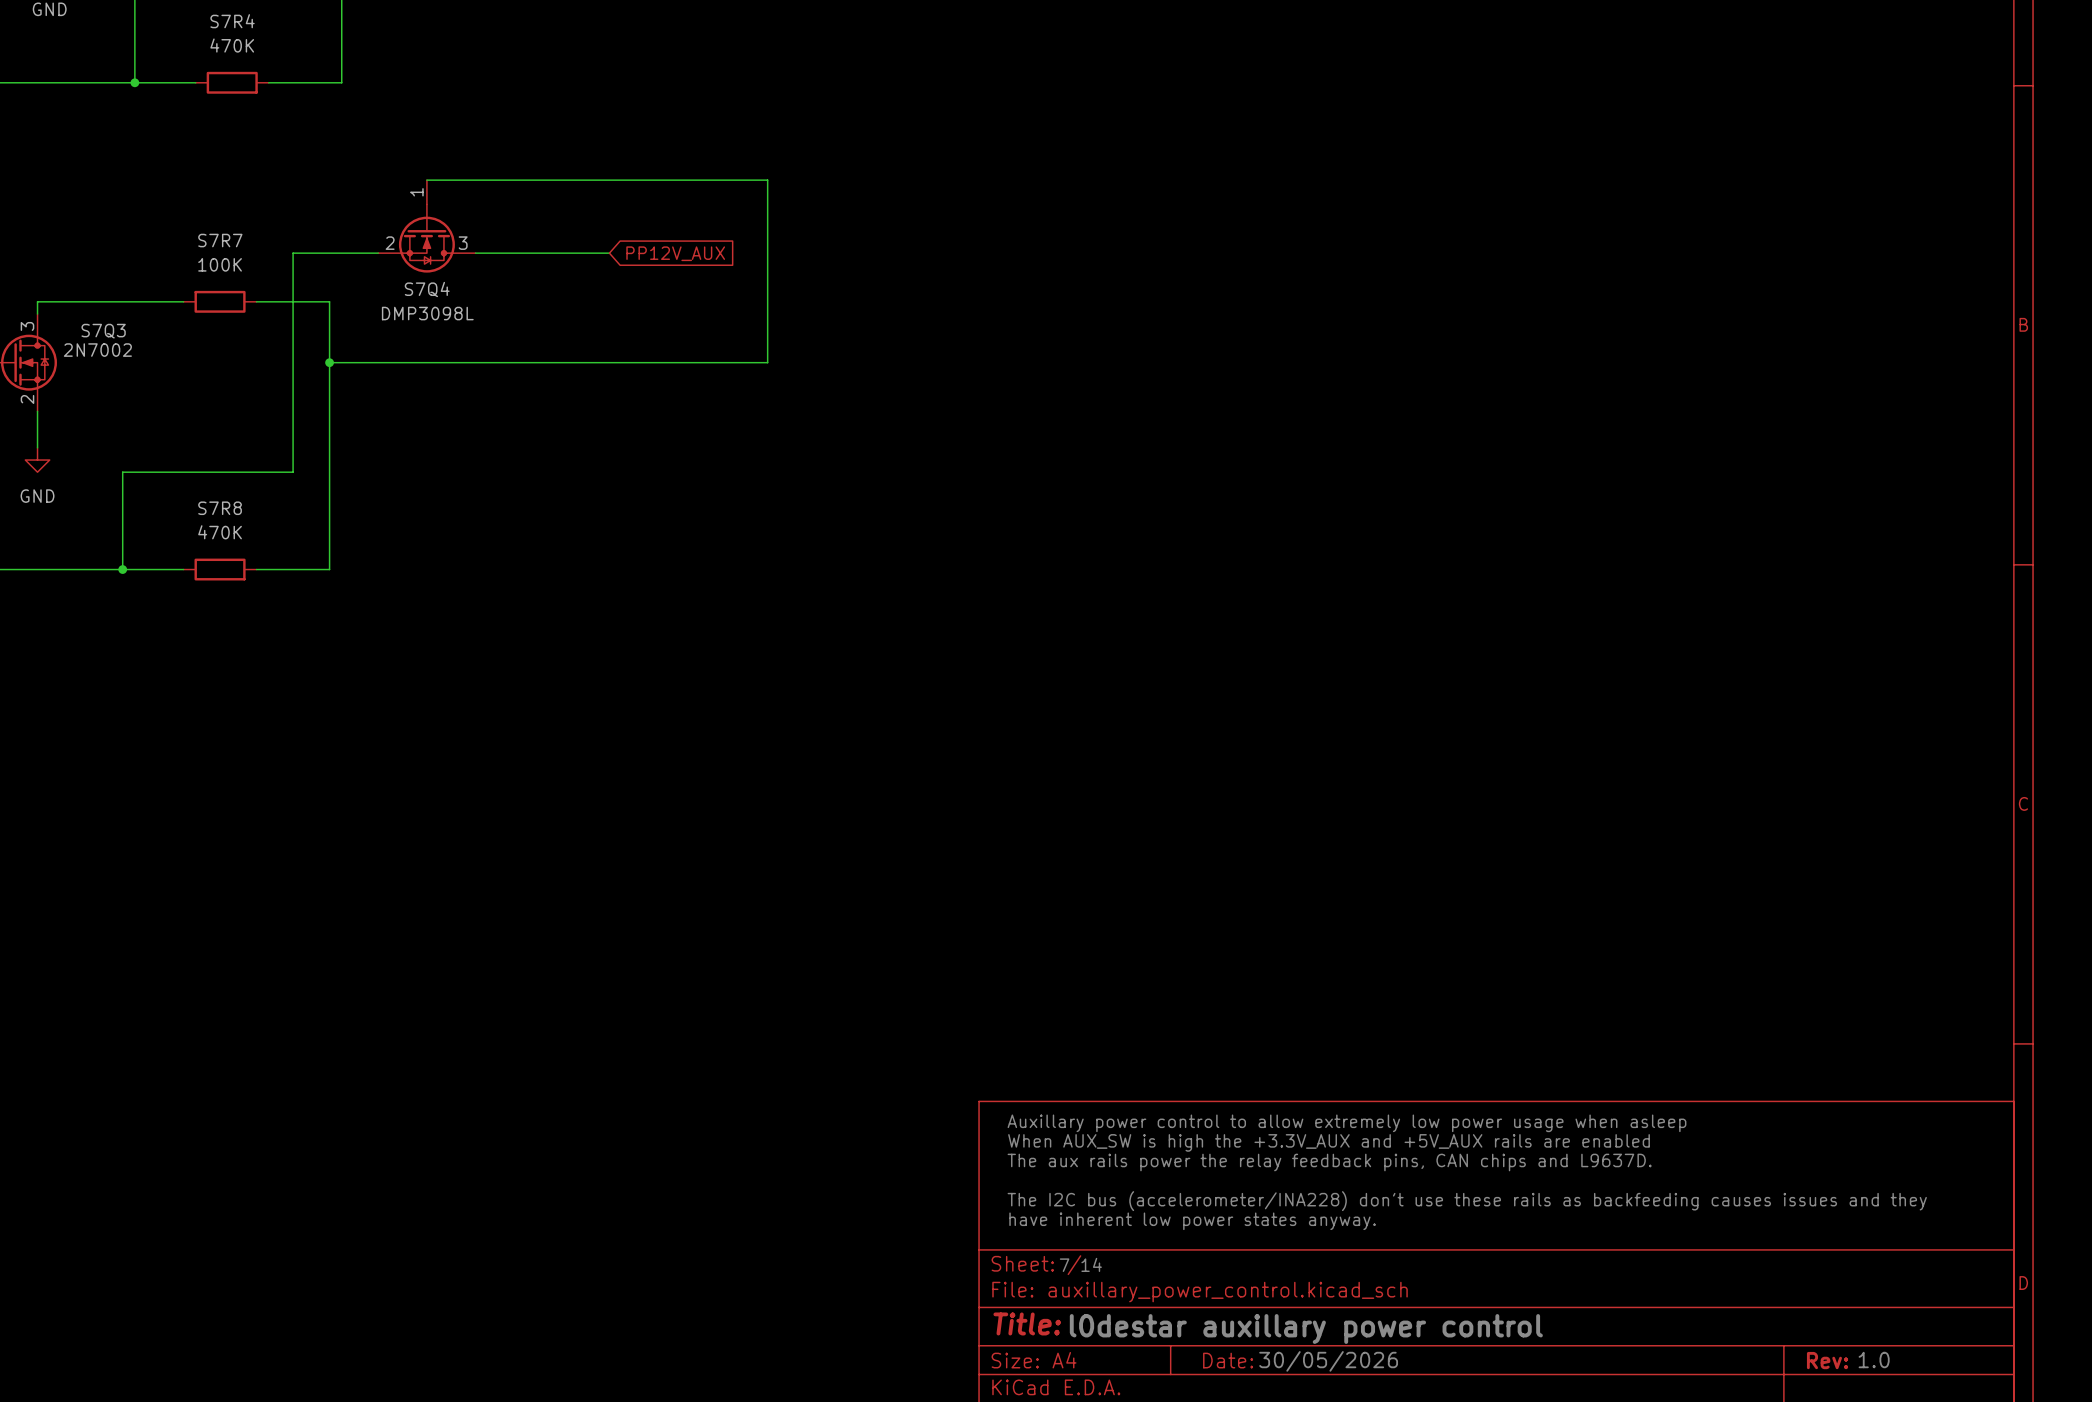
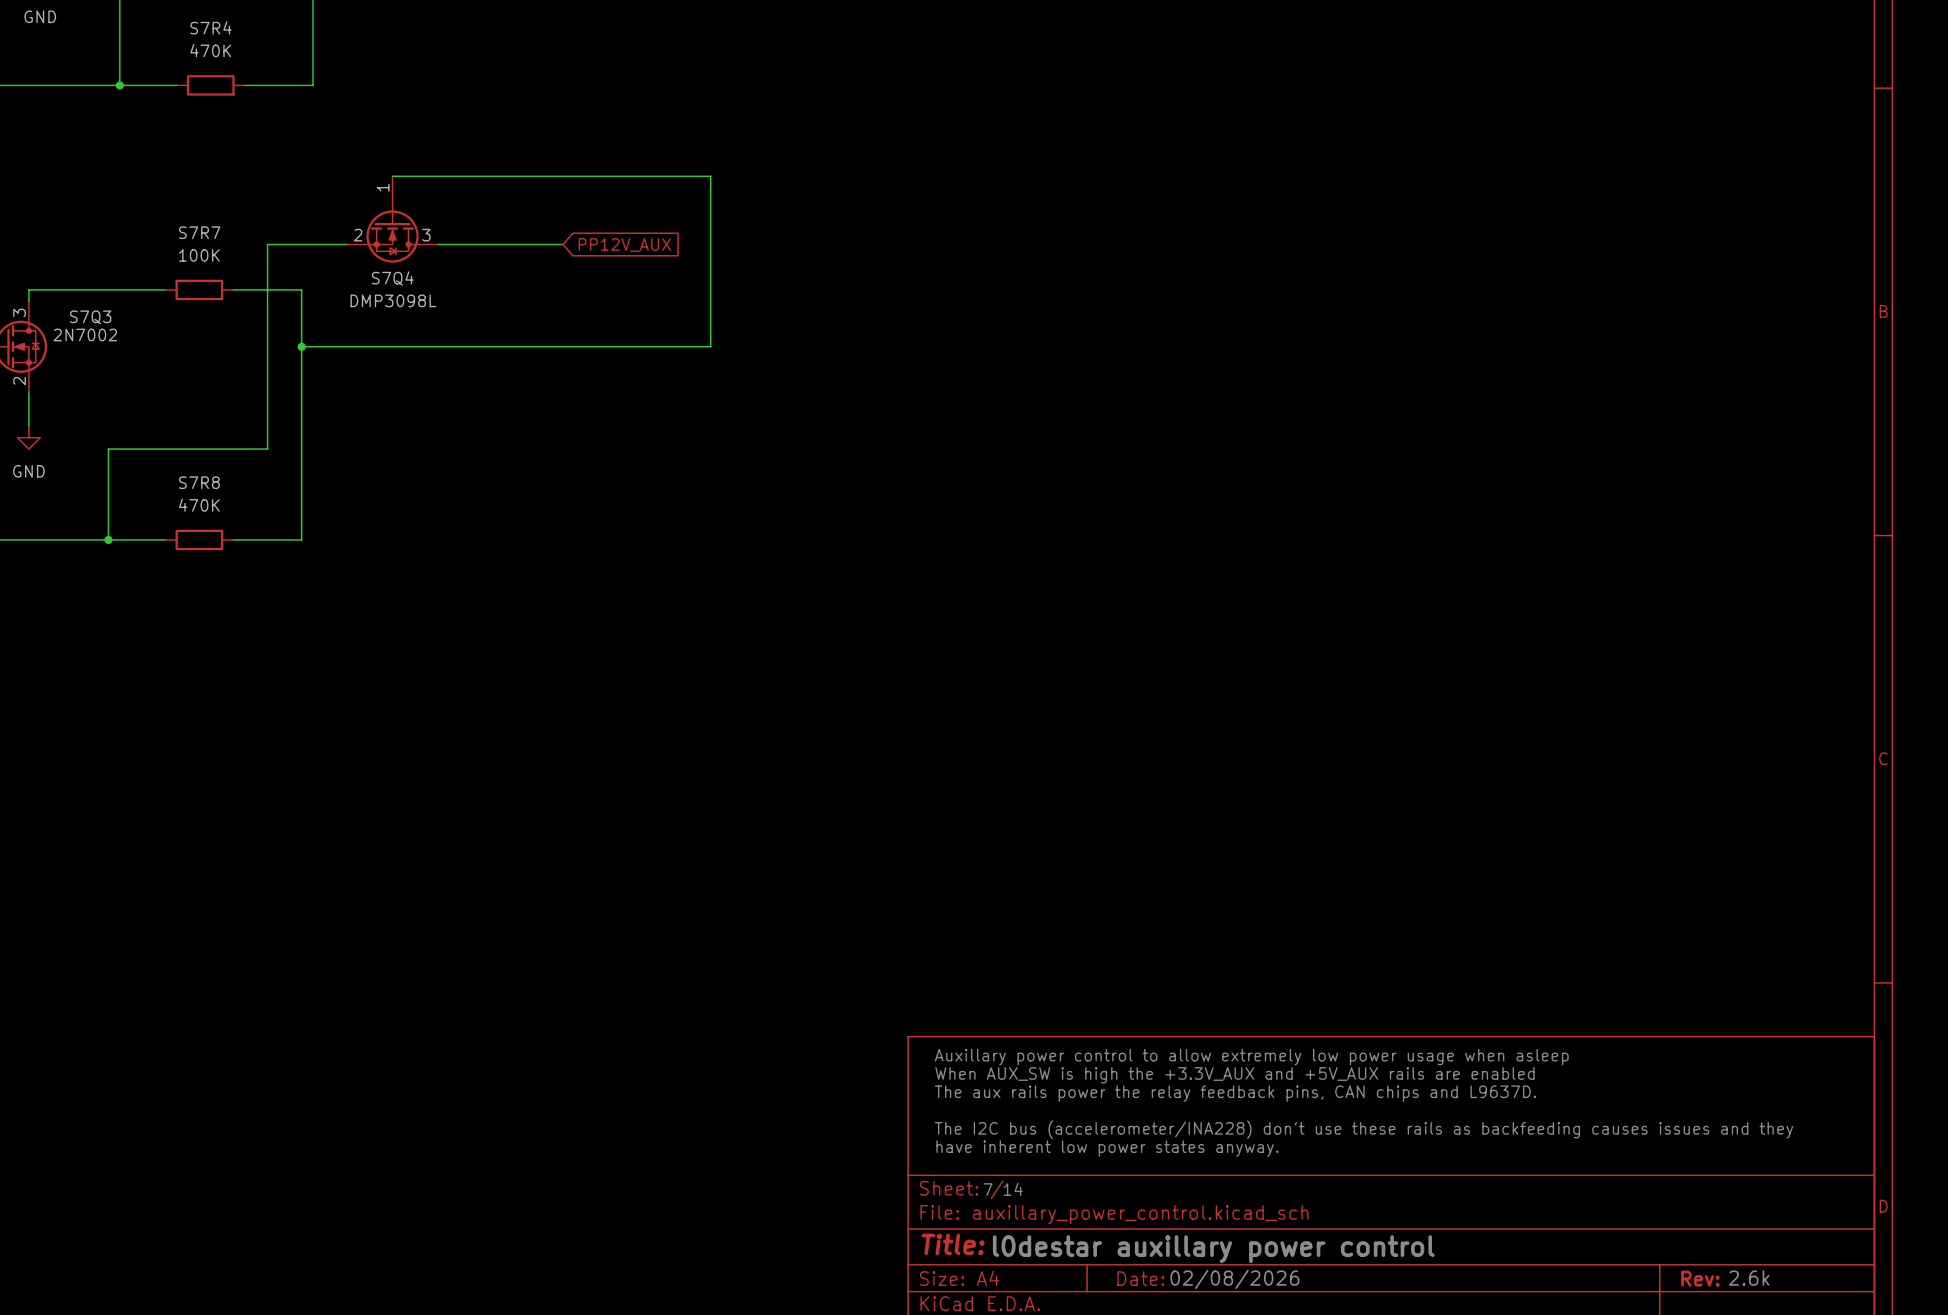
text: 1.0 (1874, 1360) -> 2.6k (1749, 1278)
text: 30/05/2026 (1328, 1361) -> 02/08/2026 (1234, 1279)

